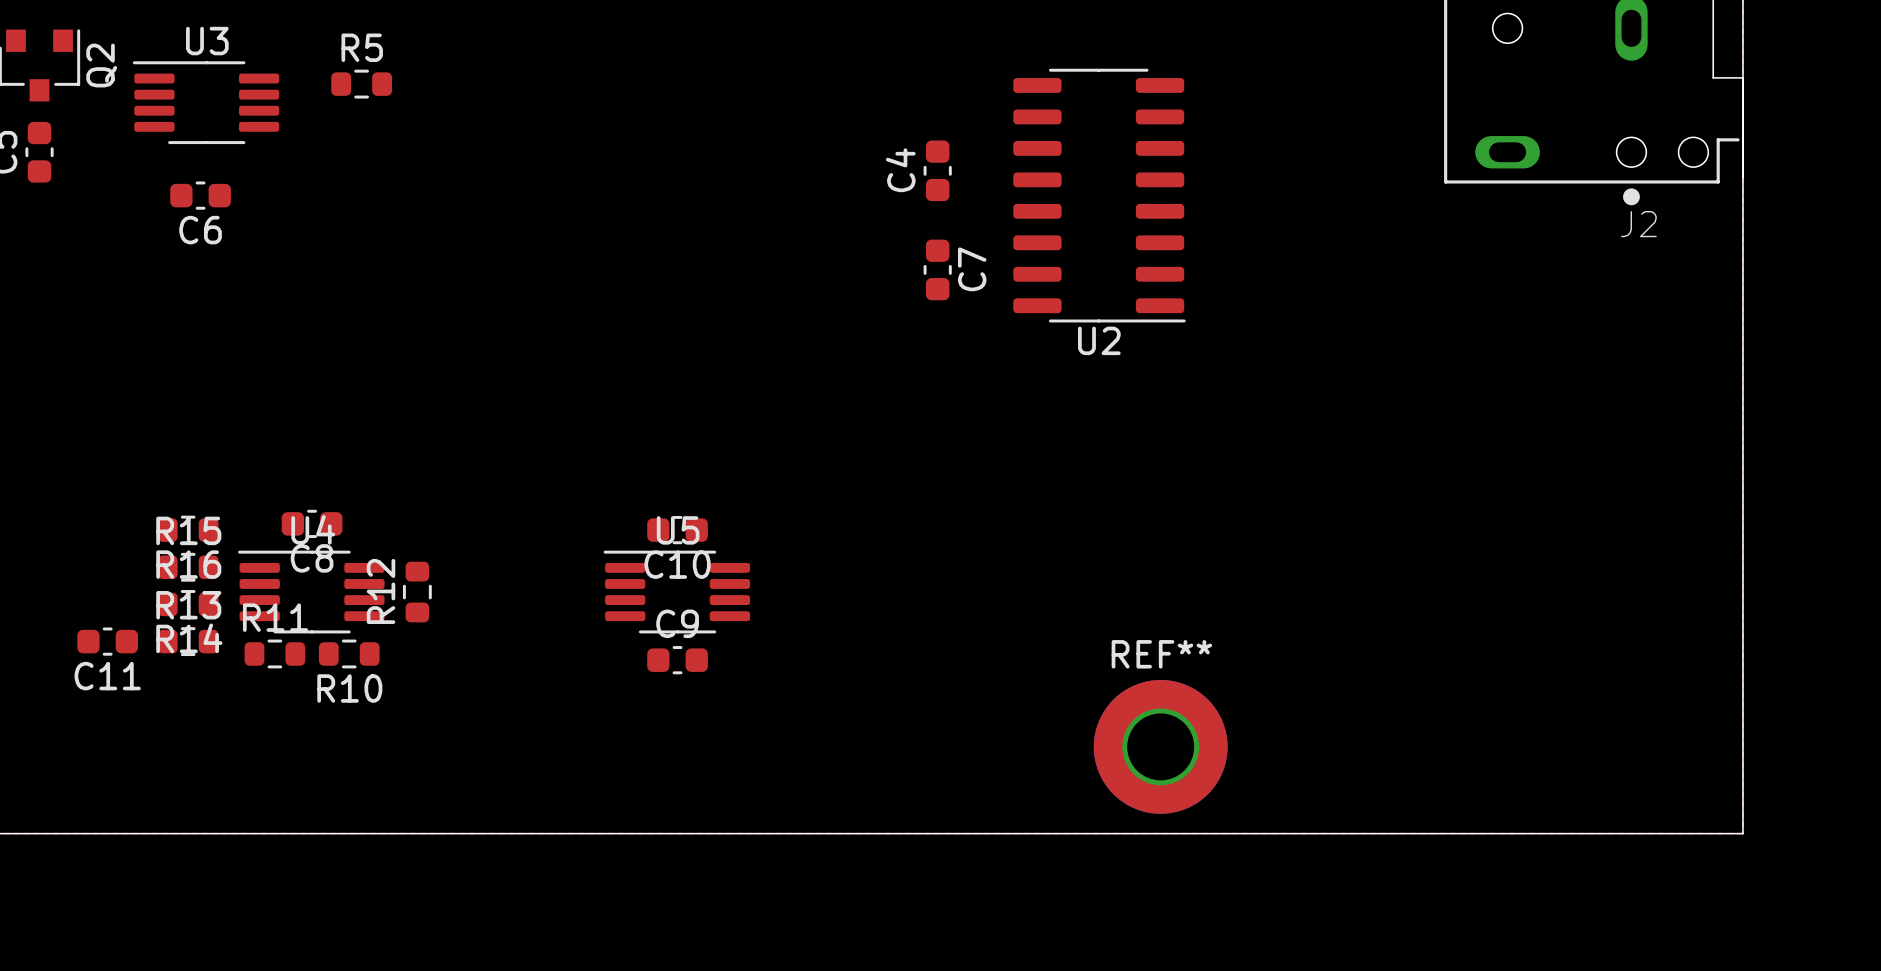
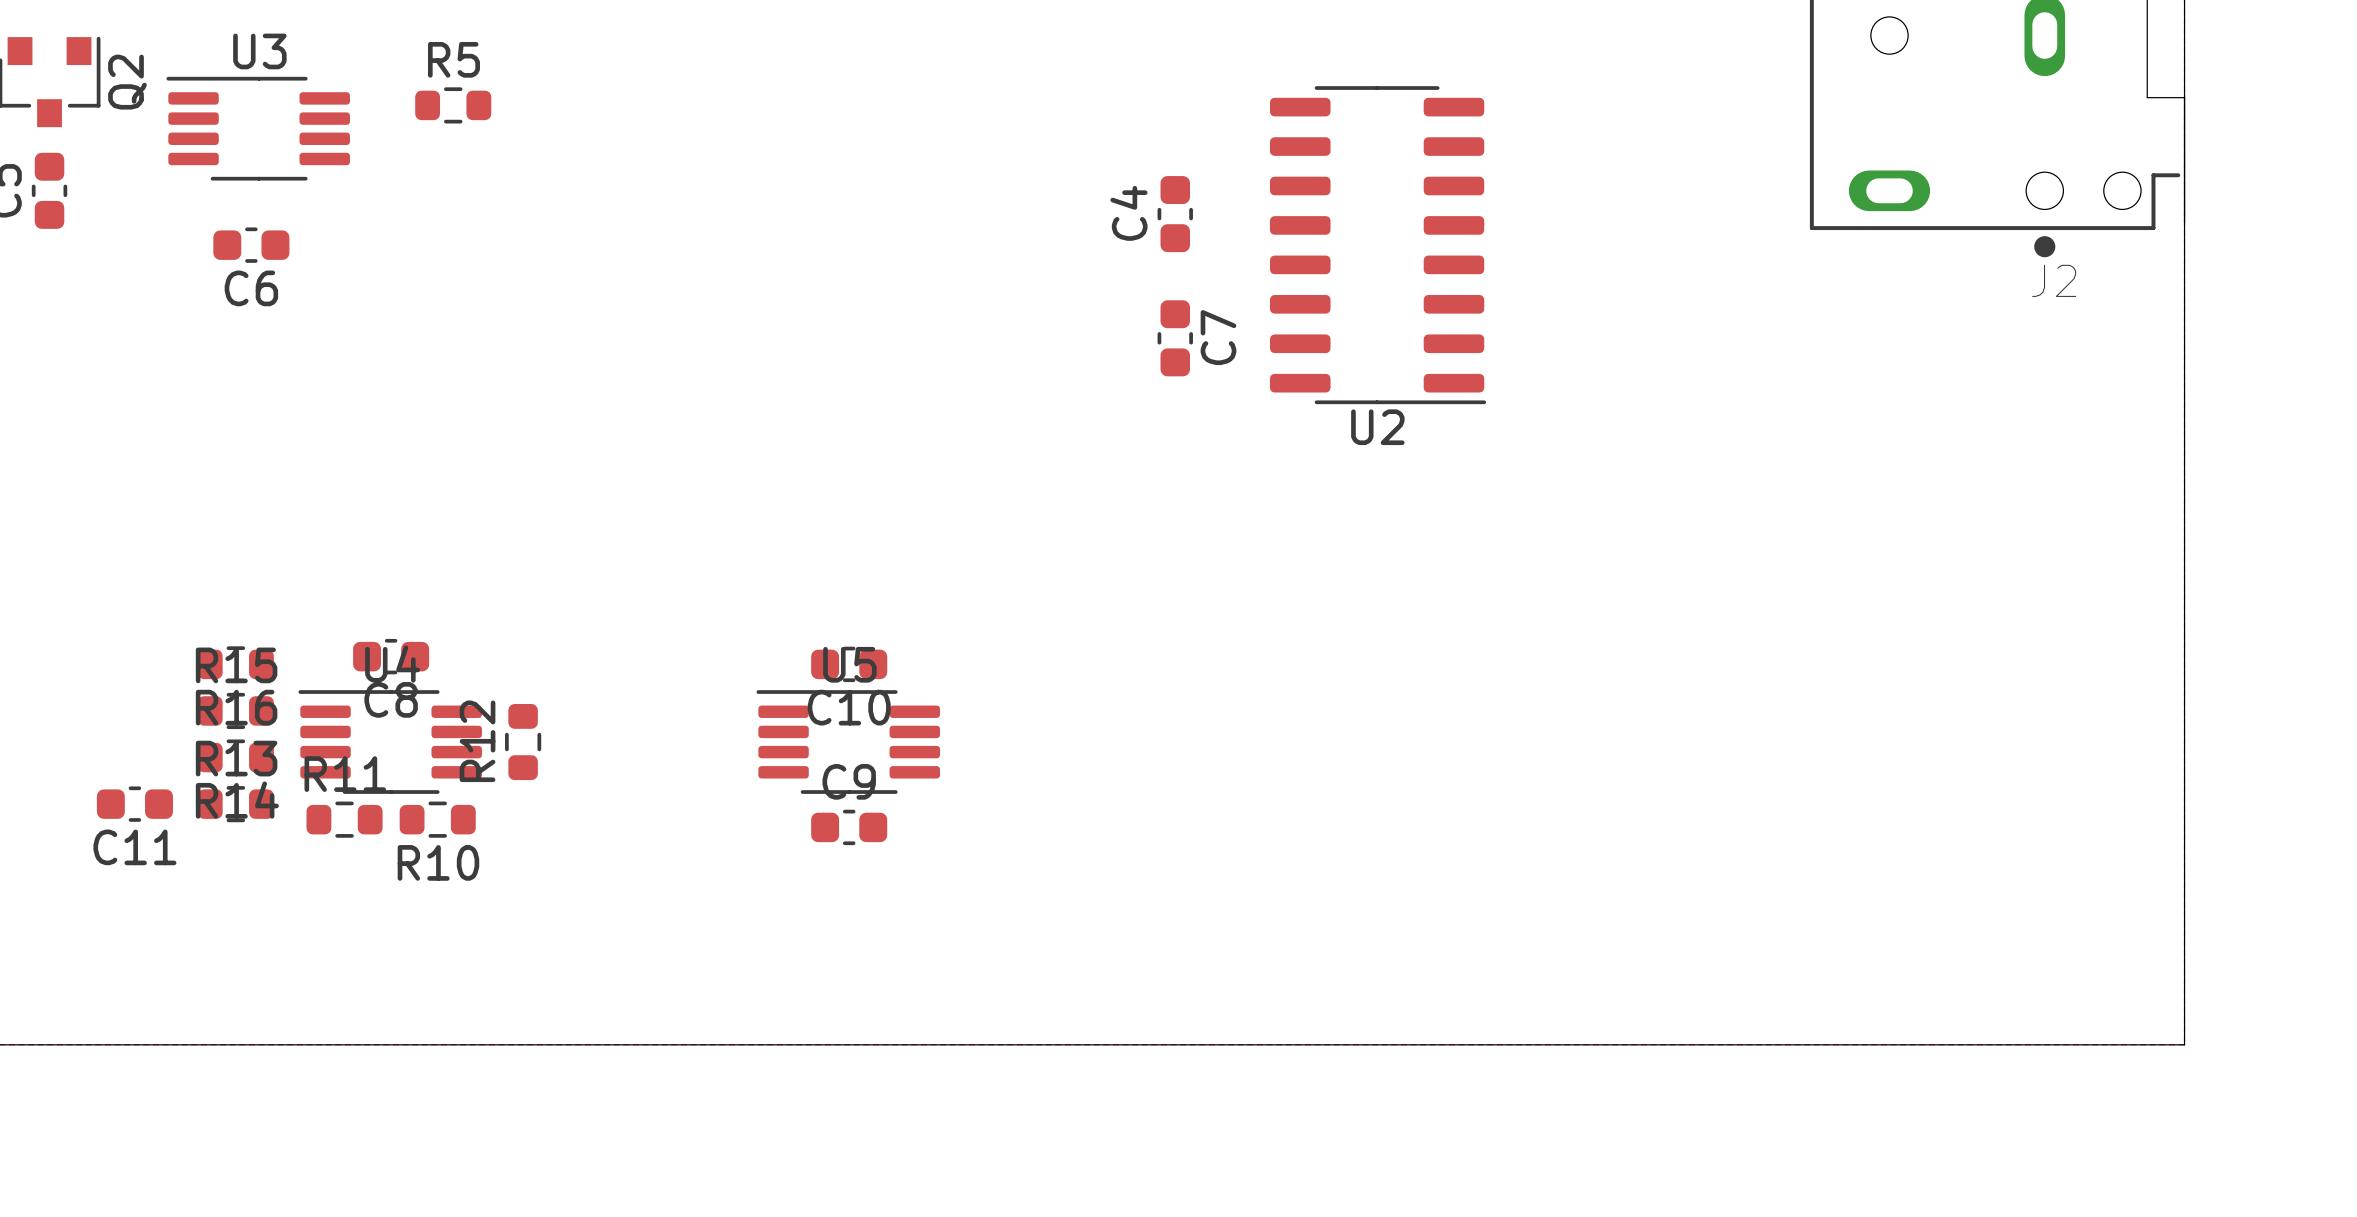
REF**: (1160, 746) -> none

